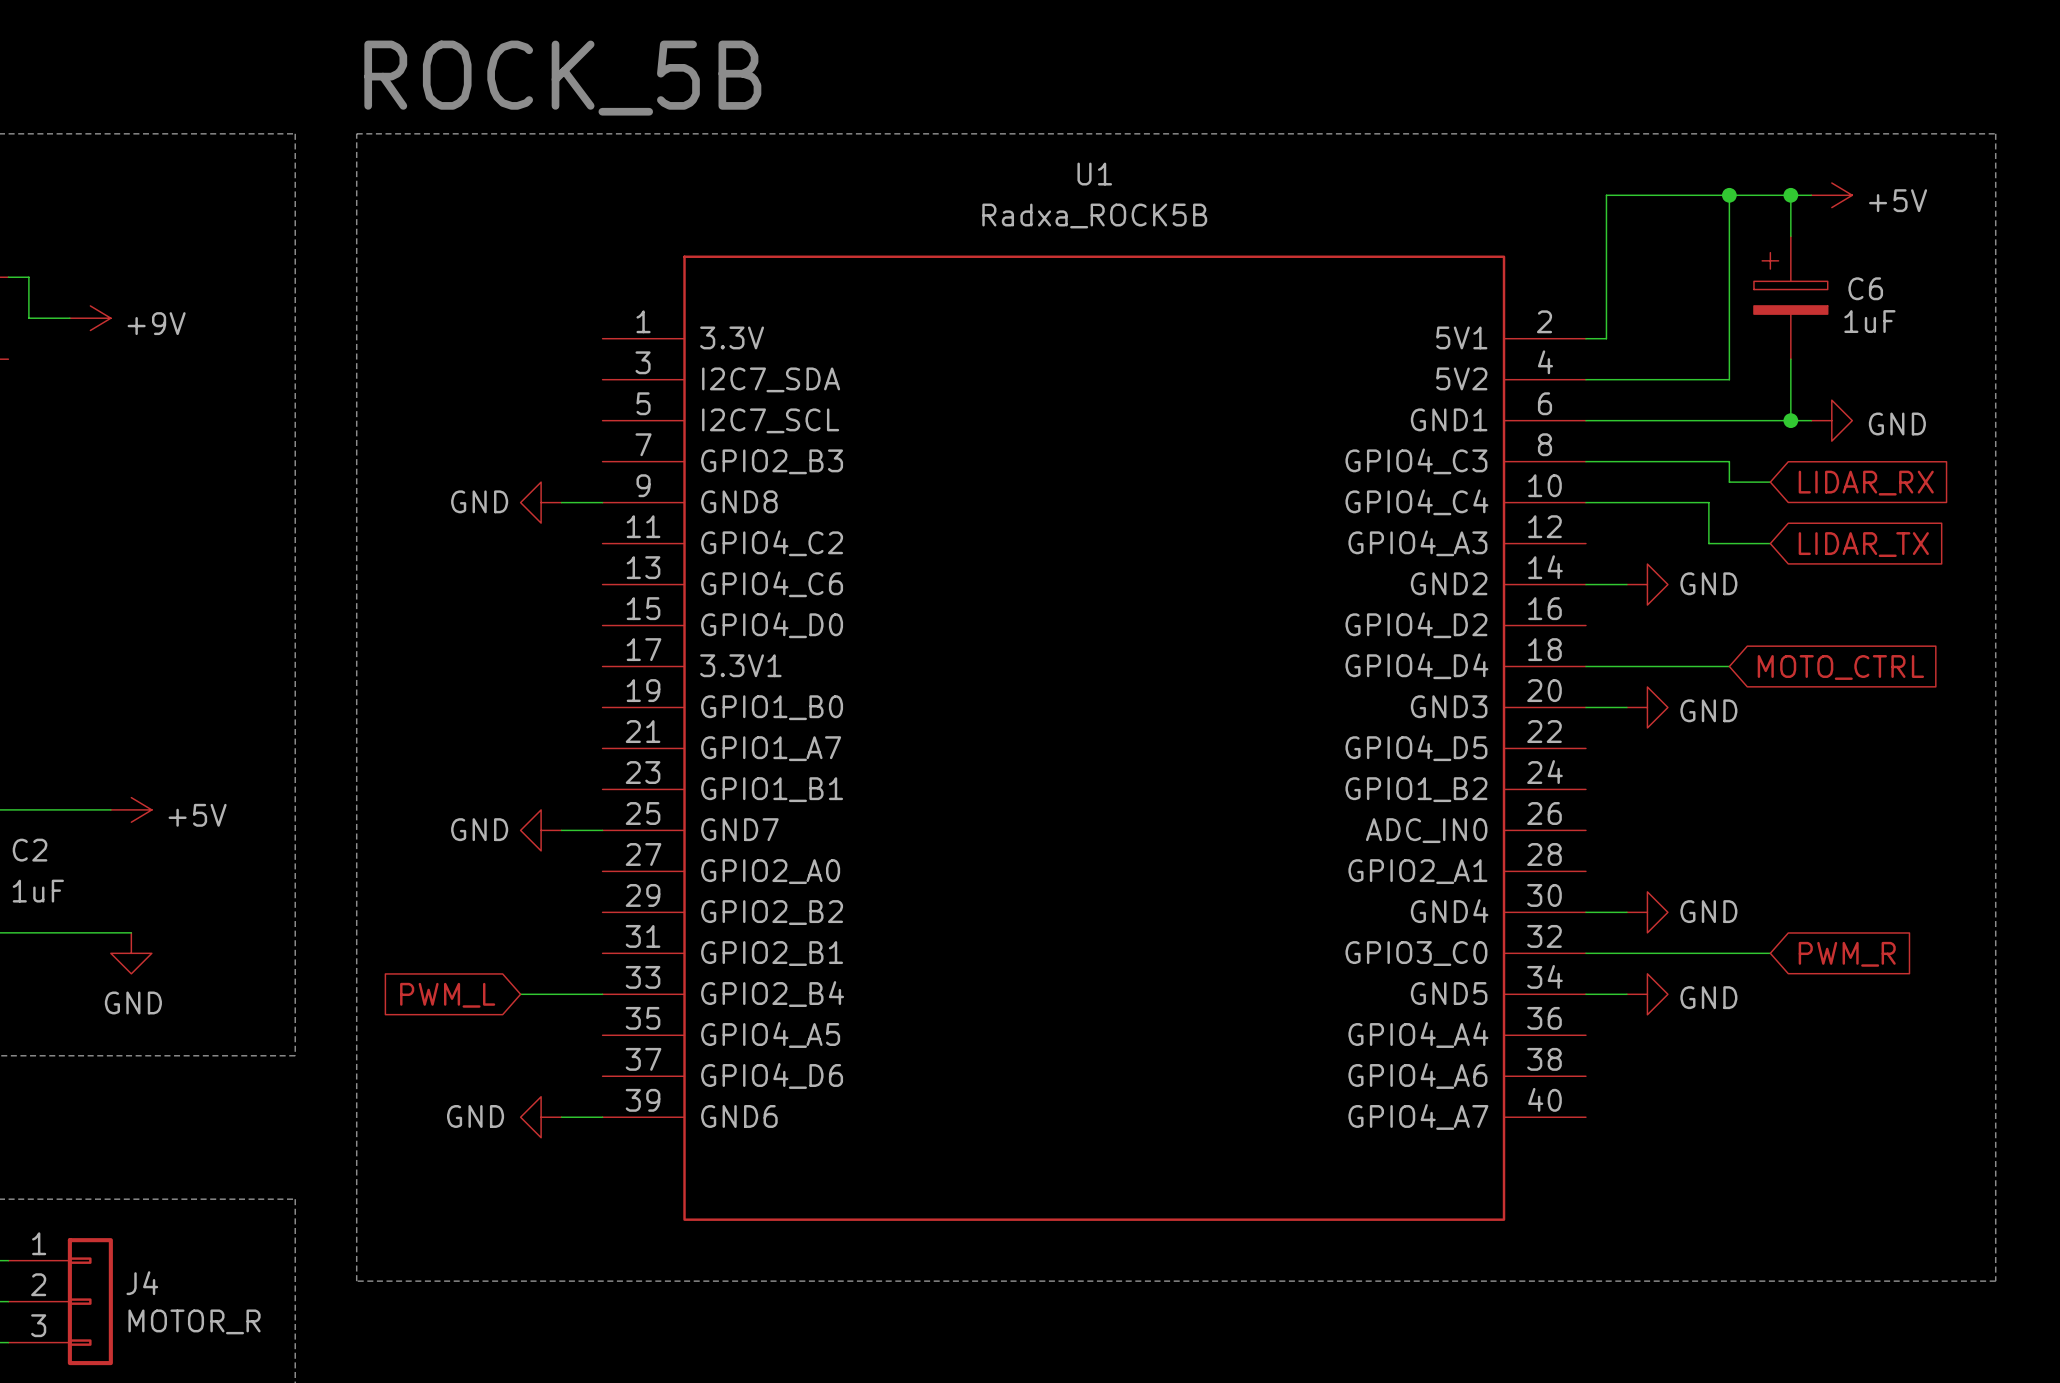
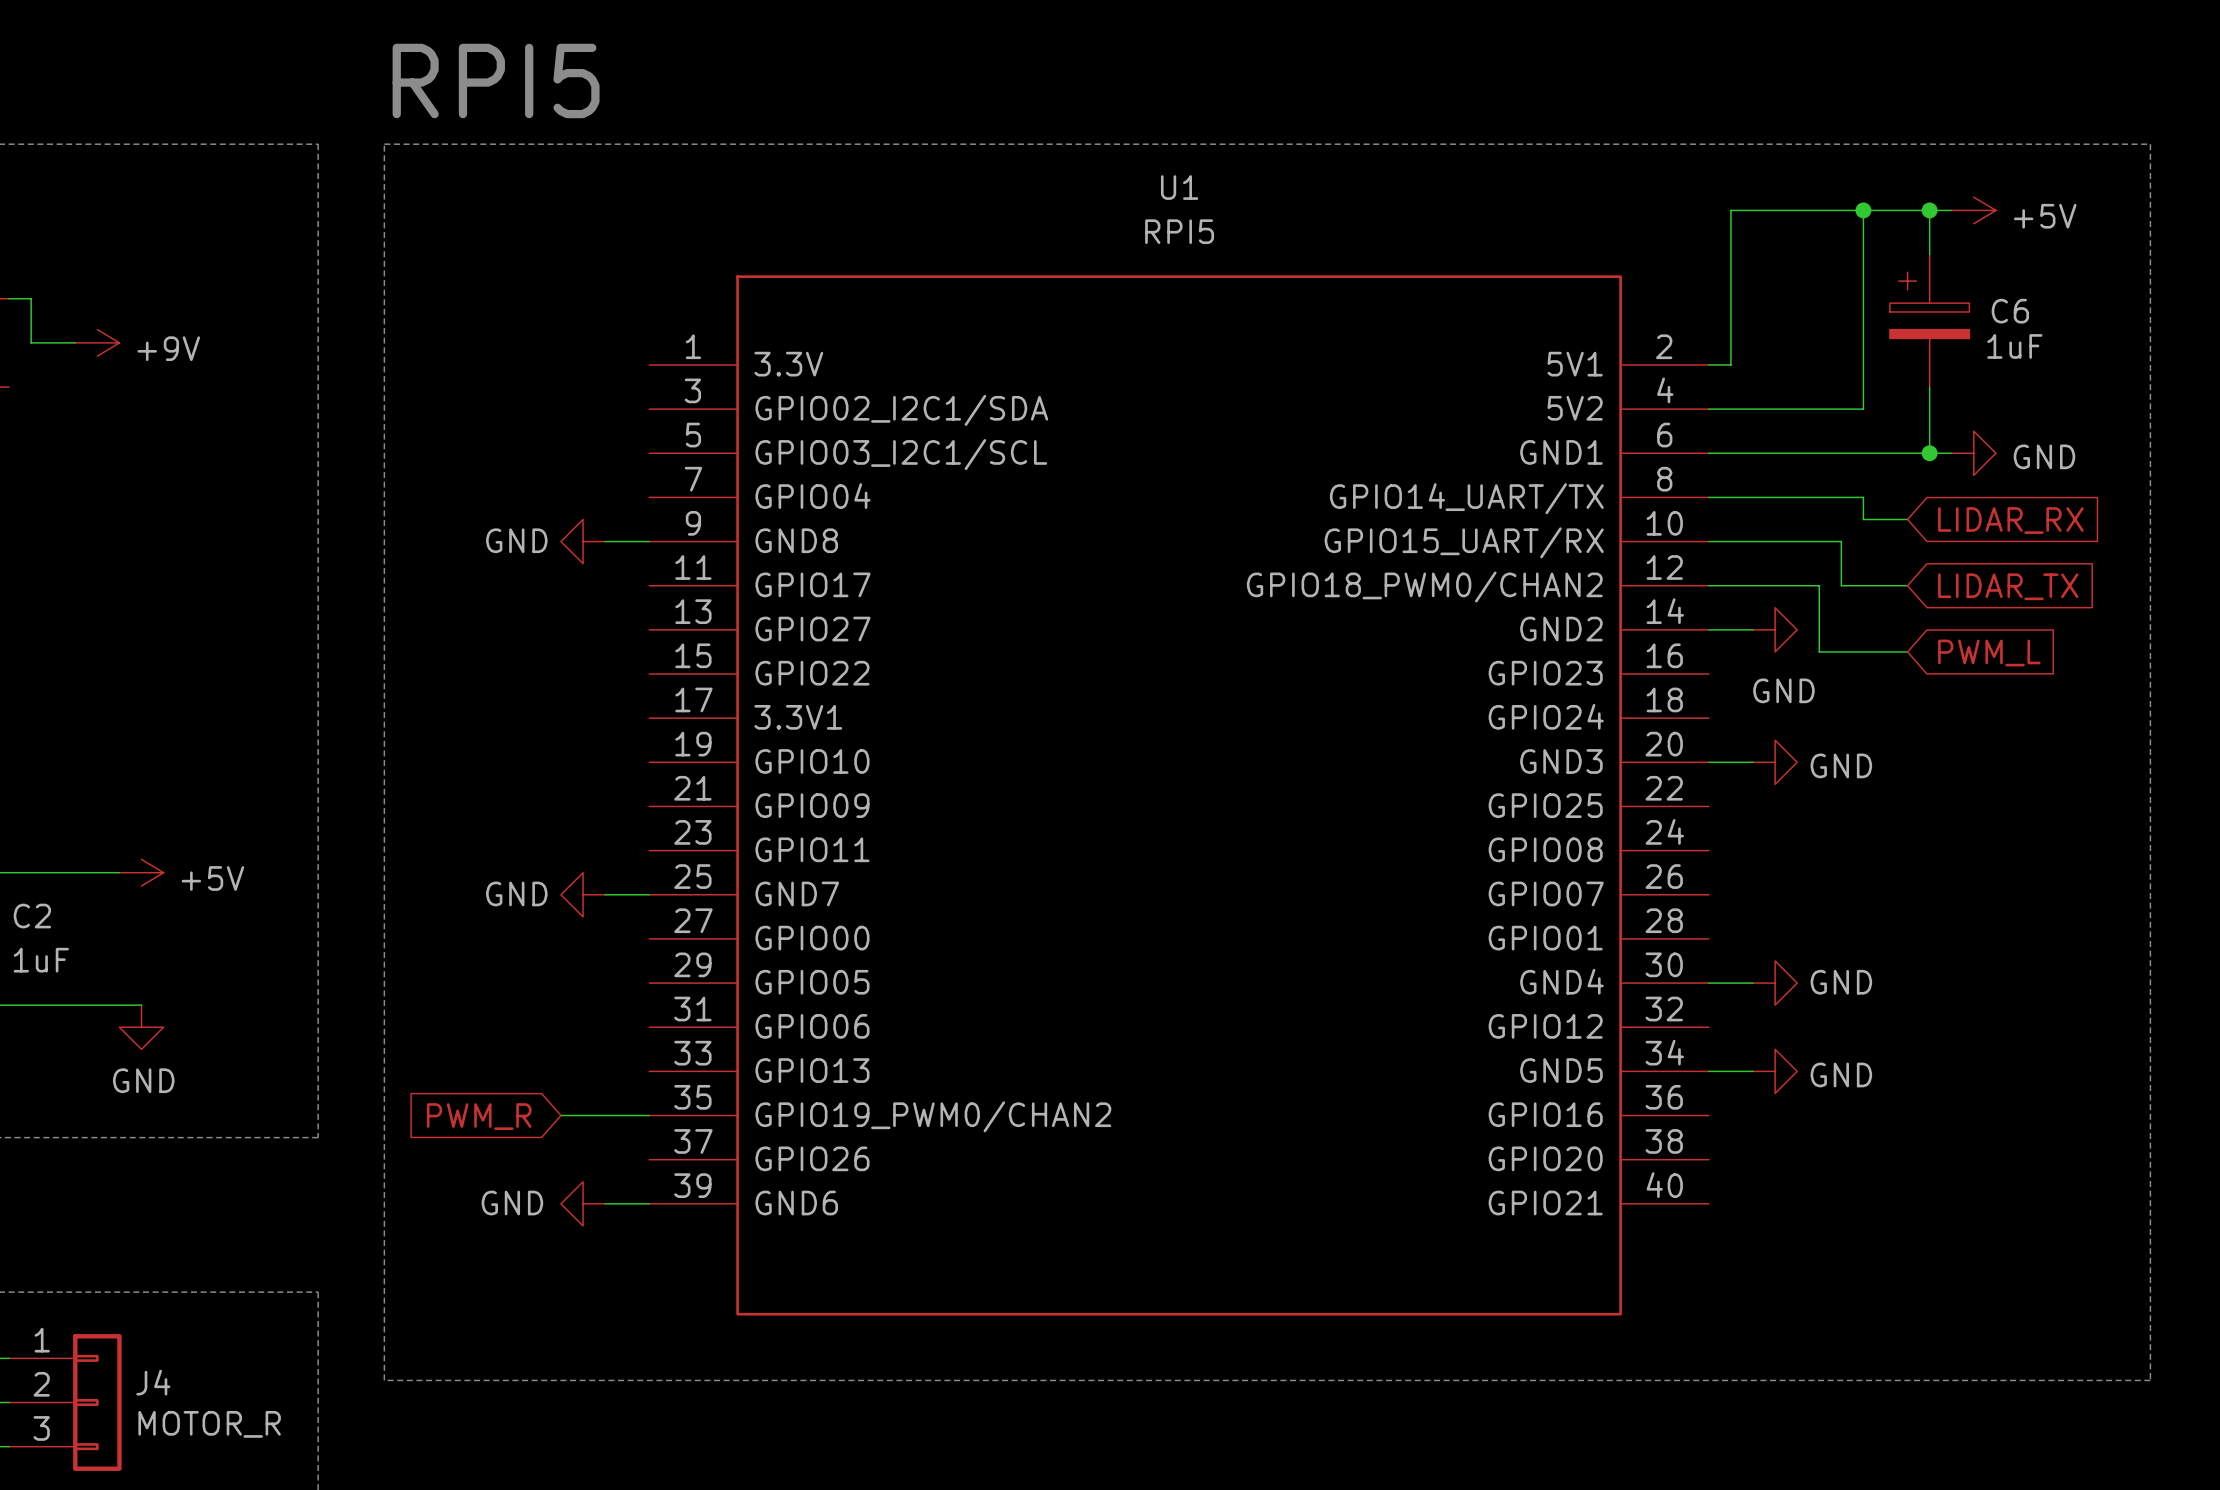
text: ROCK_5B (562, 78) -> RPI5 (496, 80)
U1 value: Radxa_ROCK5B (1094, 215) -> RPI5 (1179, 231)
U1 symbol: [602, 255, 1586, 1221] -> [649, 275, 1709, 1316]
wire: none -> (1708, 585) (1819, 585) (1819, 651) (1907, 651)
power symbol text position: GND (1708, 583) -> GND (1783, 690)
global label: none -> PWM_L (1989, 652)
wire: (1585, 666) (1729, 666) -> none
global label: MOTO_CTRL (1840, 667) -> none
wire: (1585, 953) (1770, 953) -> none
global label: PWM_R (1847, 954) -> none
wire: (520, 994) (602, 994) -> (560, 1115) (649, 1115)
global label: PWM_L (447, 995) -> PWM_R (479, 1116)

